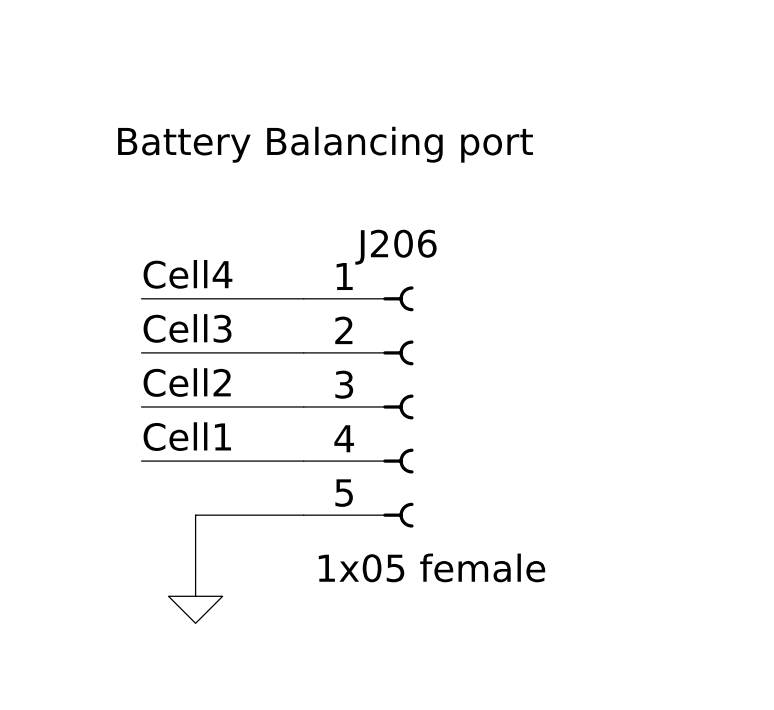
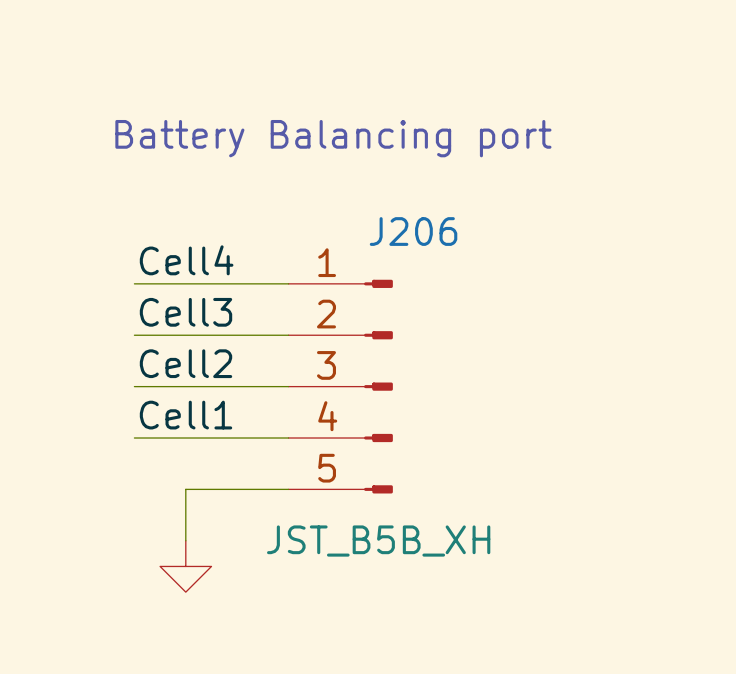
J206 name position: J206 (395, 247) -> J206 (413, 231)
J206 symbol: [303, 286, 414, 528] -> [288, 279, 393, 494]
J206 value: 1x05 female (432, 567) -> JST_B5B_XH (378, 541)

